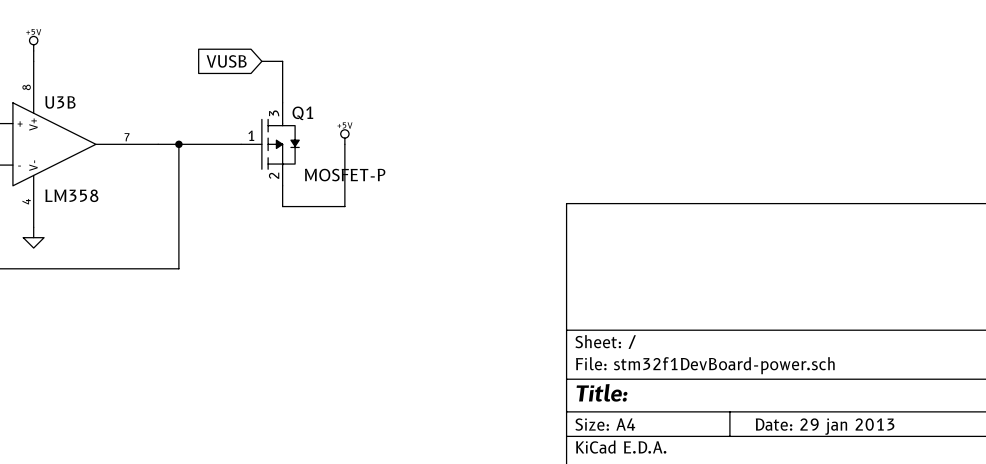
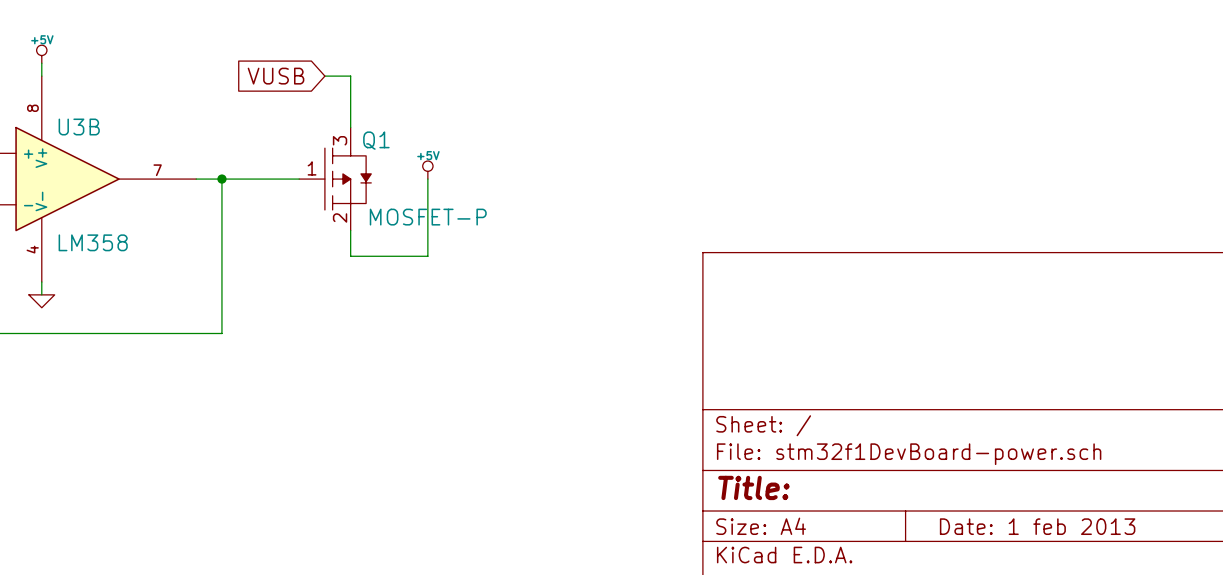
title block: Date: 29 jan 2013 (825, 426) -> Date: 1 feb 2013 (1037, 526)

